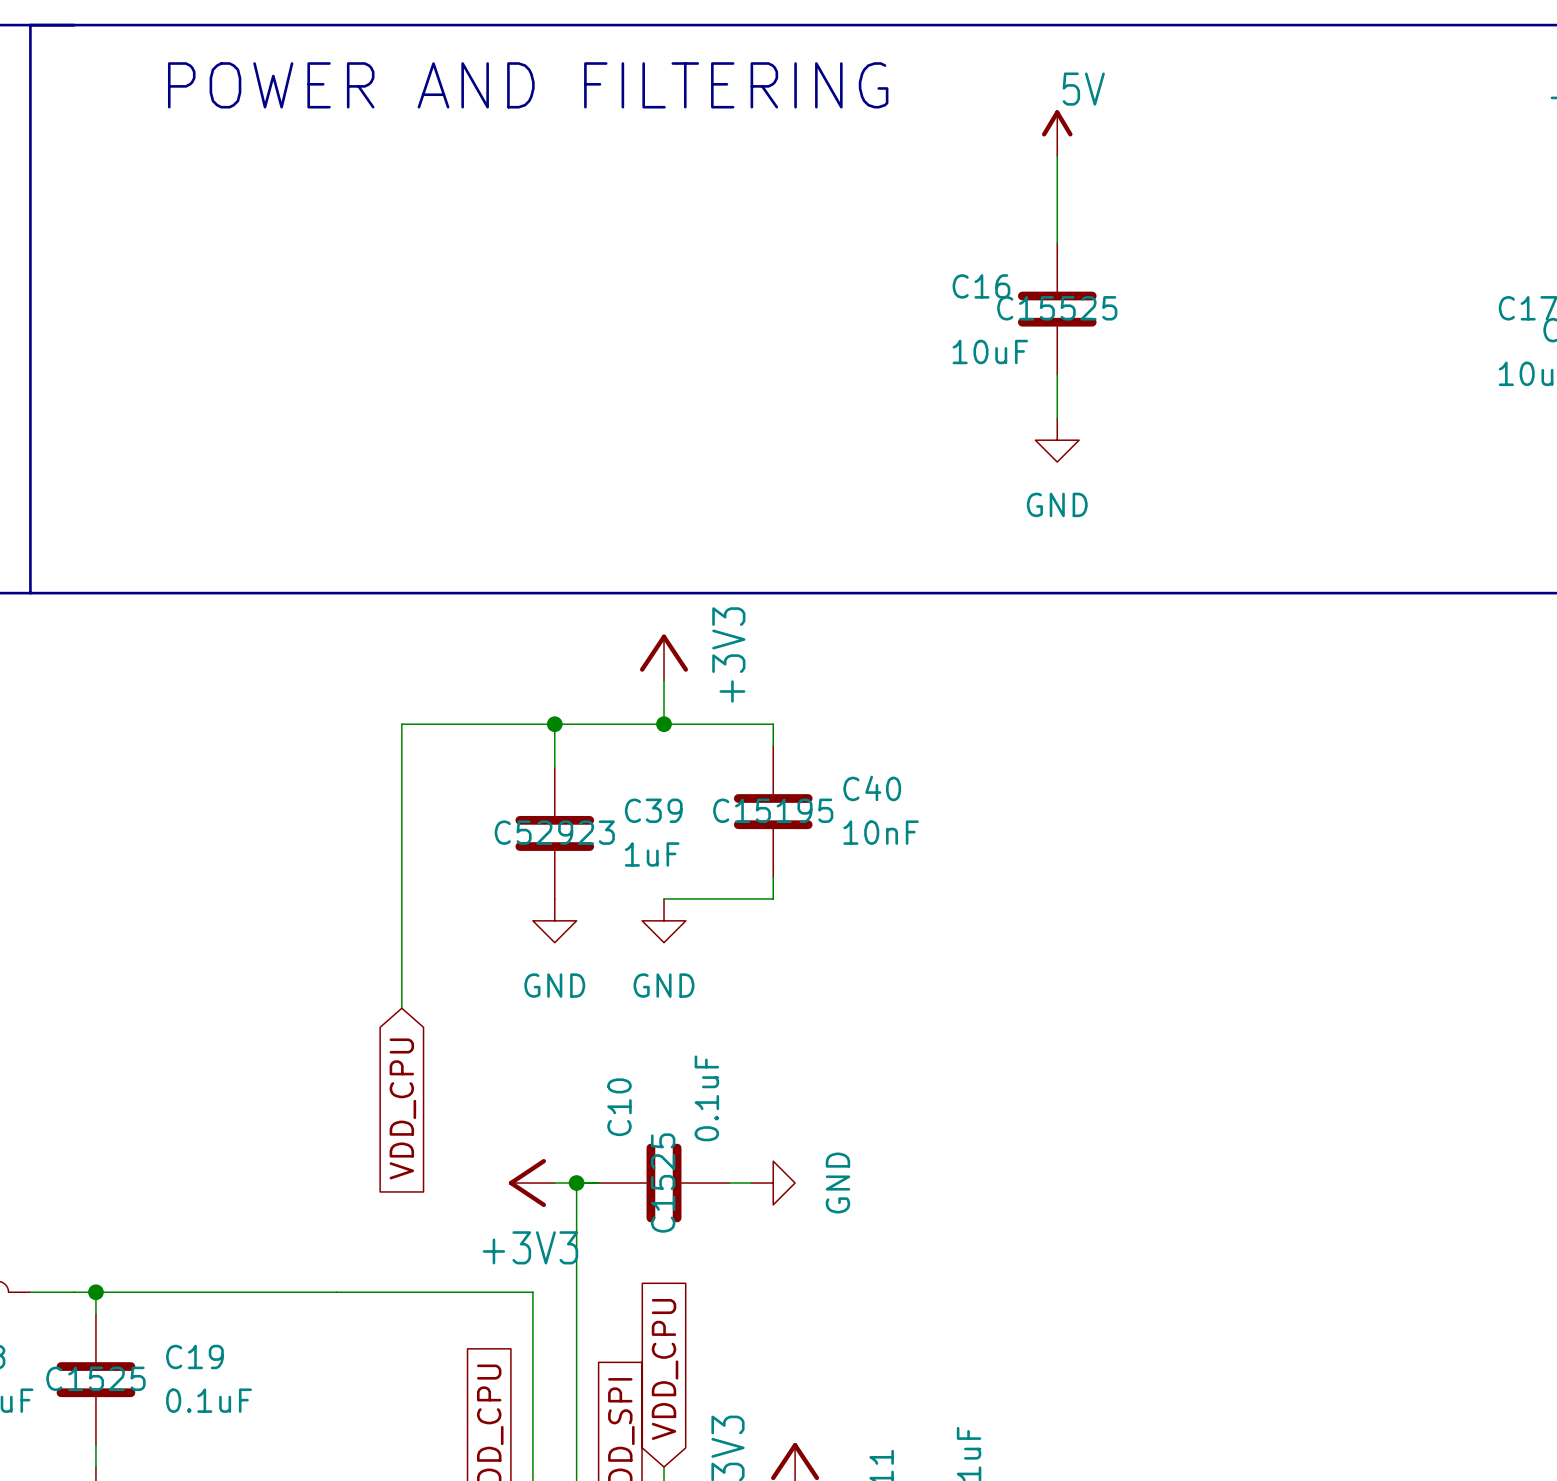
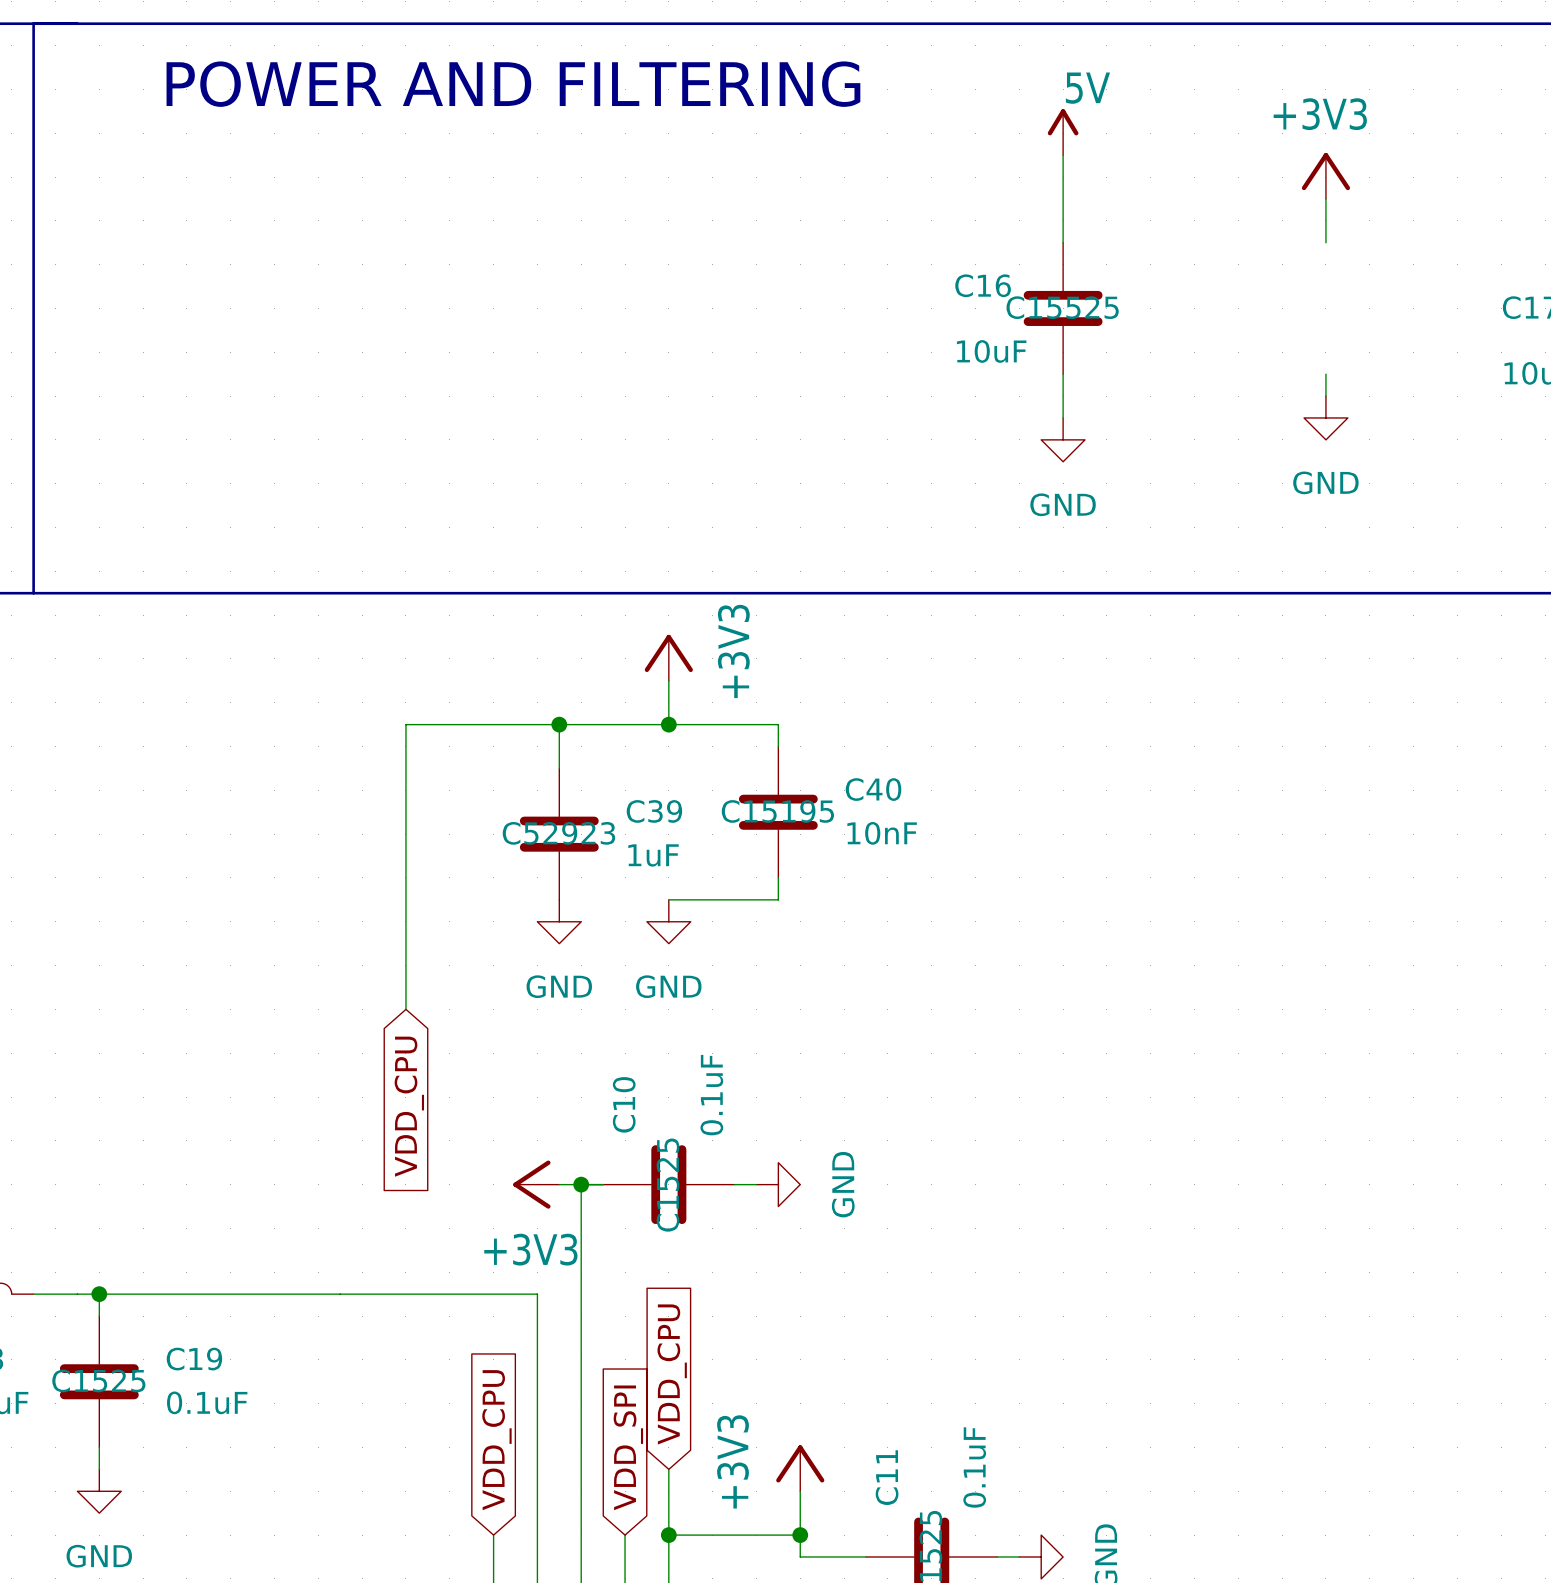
power symbol: none -> +3V3 (1325, 175)
wire: none -> (1325, 198) (1325, 242)
wire: none -> (1325, 374) (1325, 396)
power symbol: none -> GND (1325, 417)

